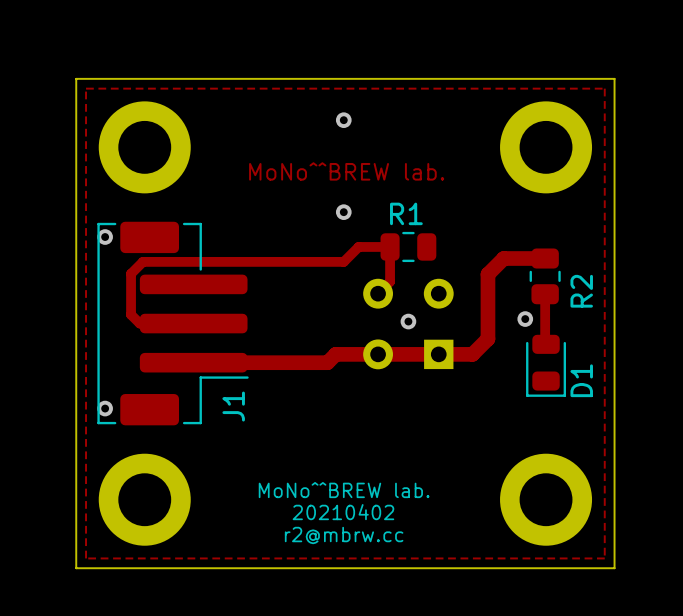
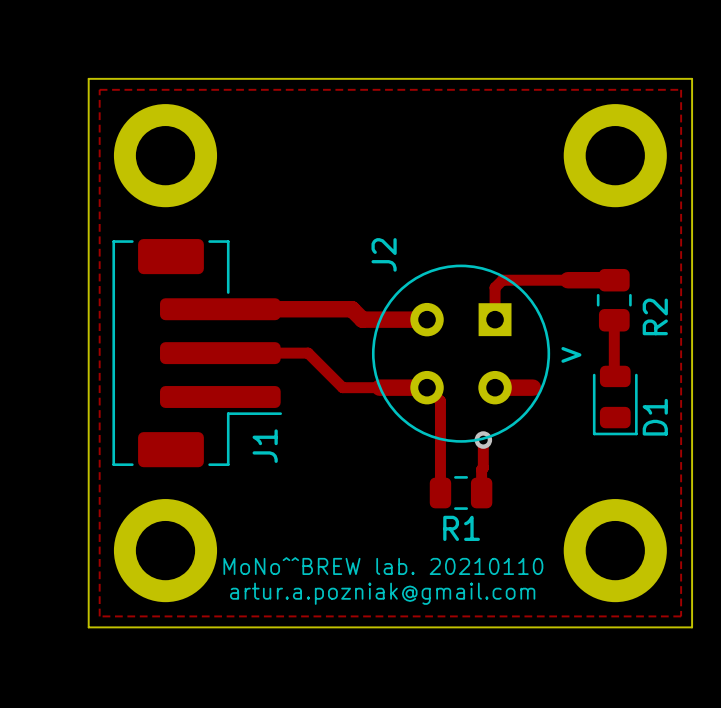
via: (343, 120) -> none
text: MoNo^^BREW lab. (346, 171) -> none
via: (343, 212) -> none
R1 name position: R1 (406, 213) -> R1 (461, 528)
via: (105, 237) -> none
R1 position: (408, 246) -> (461, 492)
track: (503, 258) (487, 274) (487, 338) (472, 354) -> (567, 280) (502, 280) (495, 287) (495, 319)
track: (378, 293) (390, 281) (390, 246) (358, 246) (343, 261) (142, 261) (131, 273) (131, 314) (139, 323) (193, 323) -> (427, 319) (362, 319) (351, 309) (220, 309)
via: (525, 319) -> none
via: (408, 321) -> none
J2 side: bottom (408, 324) -> top (461, 353)
text: none -> > (571, 354)
track: (335, 354) (327, 362) (193, 362) -> (379, 387) (342, 387) (308, 353) (220, 353)
track: (378, 354) (438, 354) -> (427, 387) (440, 401) (440, 492)
track: none -> (483, 440) (481, 492)
via: none -> (483, 440)
via: (105, 408) -> none
text: MoNo^^BREW lab. (344, 490) -> none
text: 20210402 (343, 512) -> MoNo^^BREW lab. 20210110 (383, 566)
text: r2@mbrw.cc (344, 535) -> artur.a.pozniak@gmail.com (382, 593)

